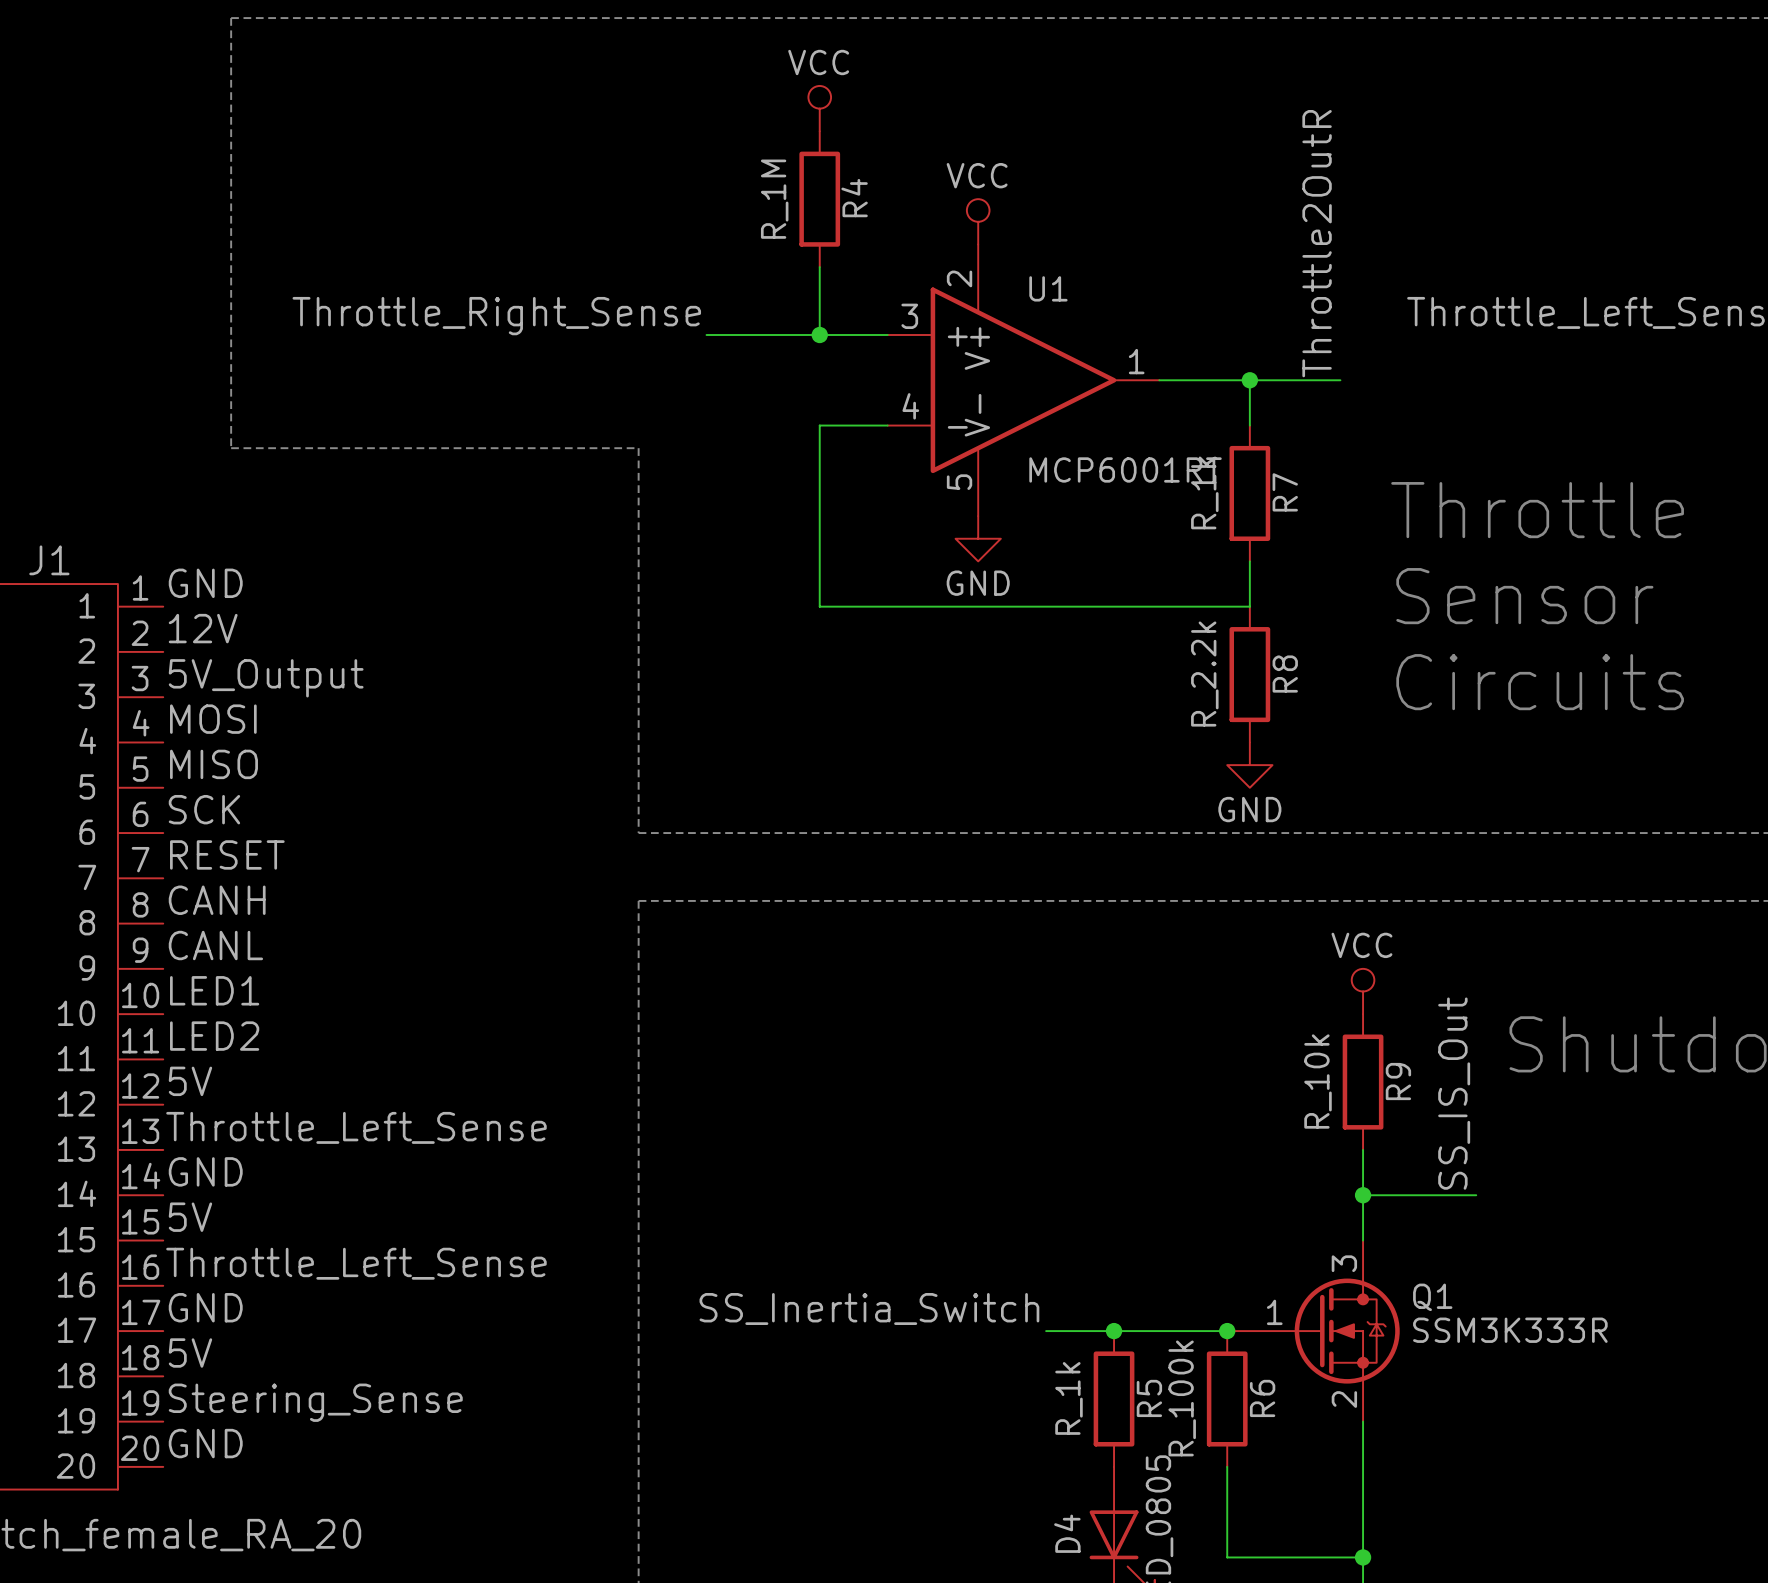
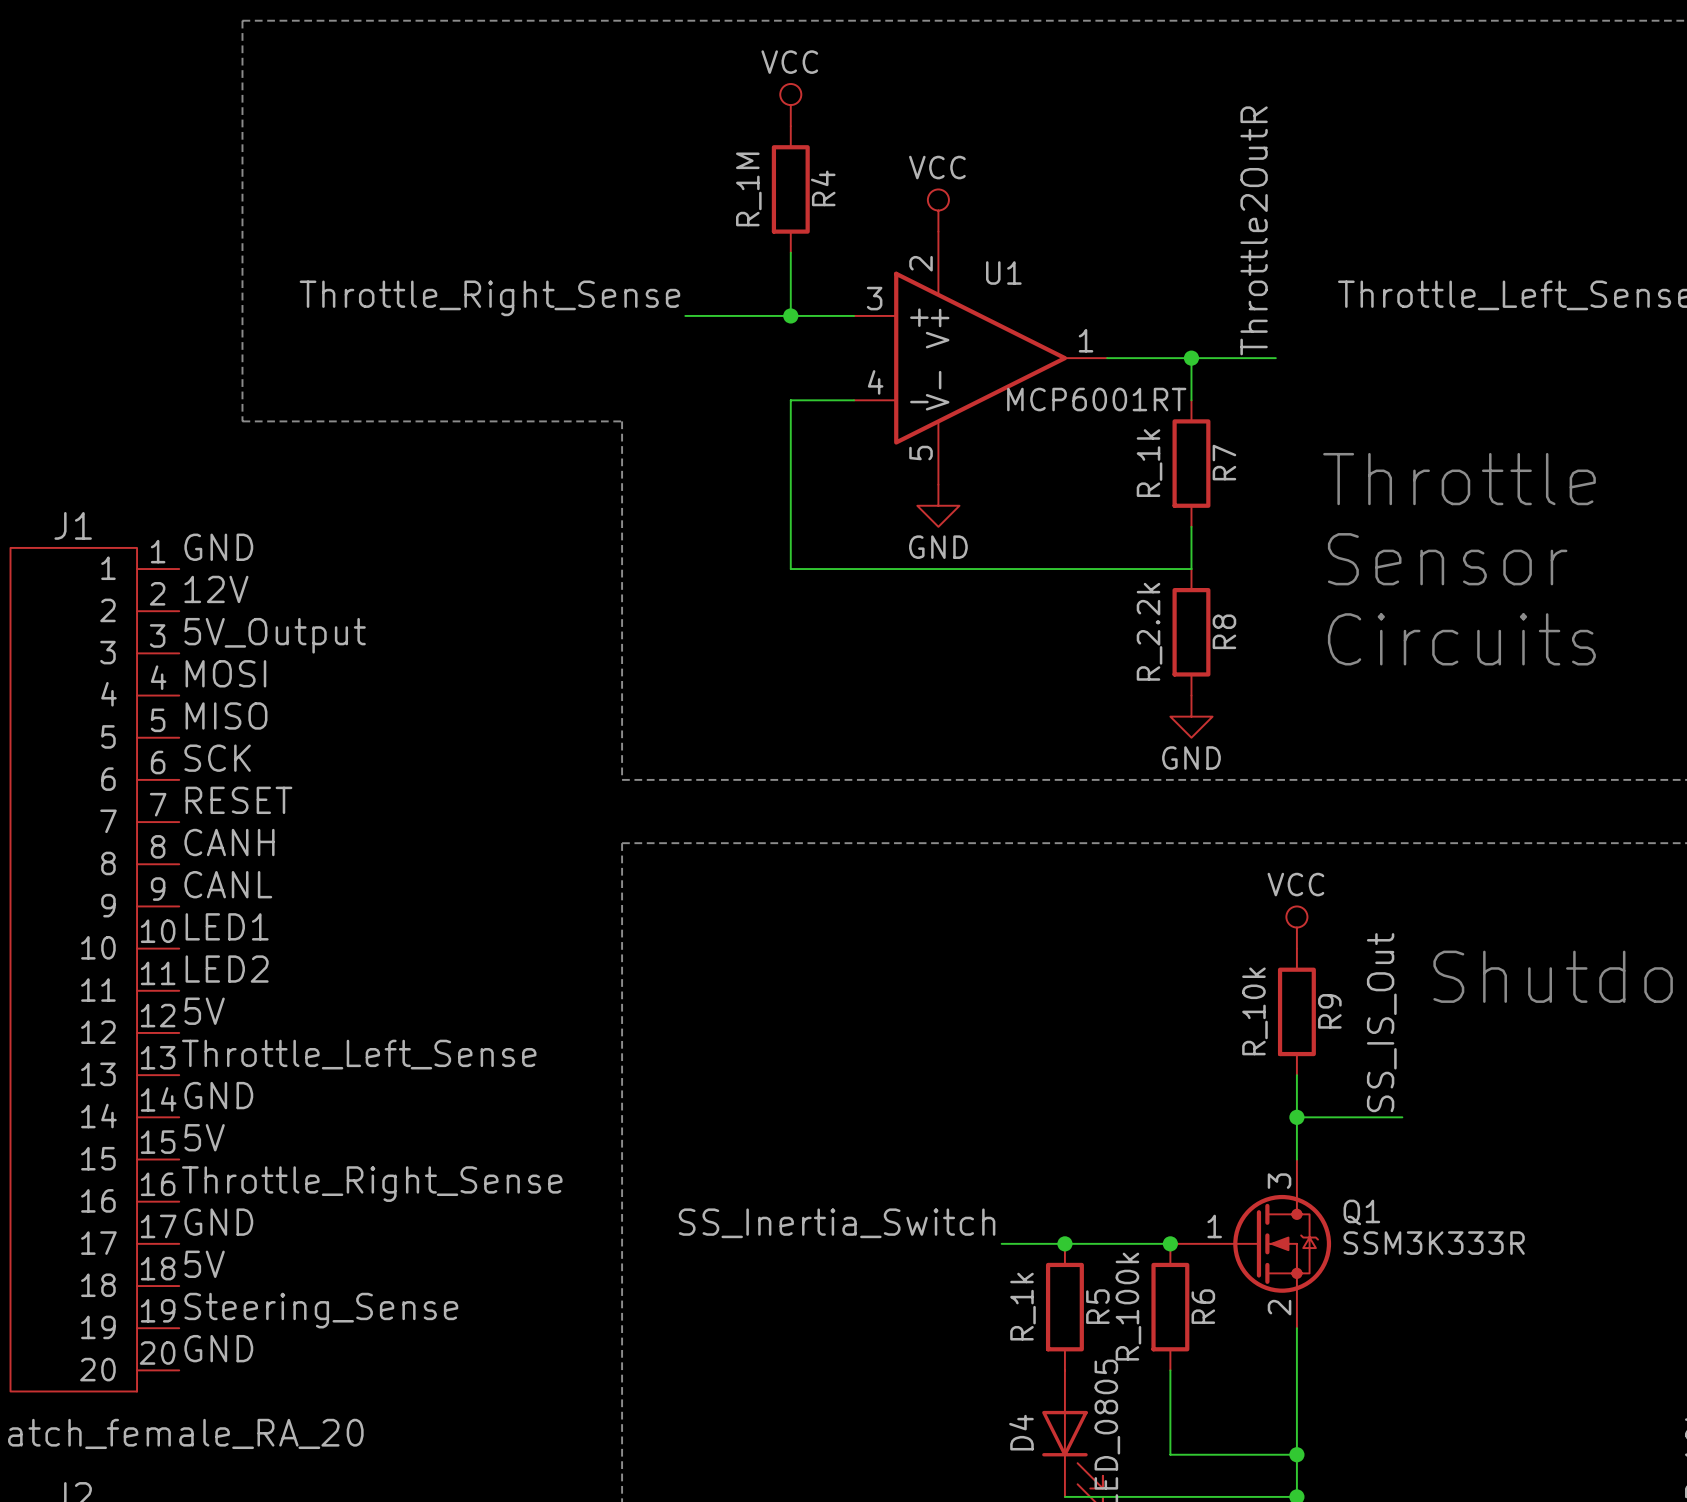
U1 value position: MCP6001RT (1125, 469) -> MCP6001RT (1096, 399)
label: Throttle_Left_Sense (356, 1263) -> Throttle_Right_Sense (372, 1184)

